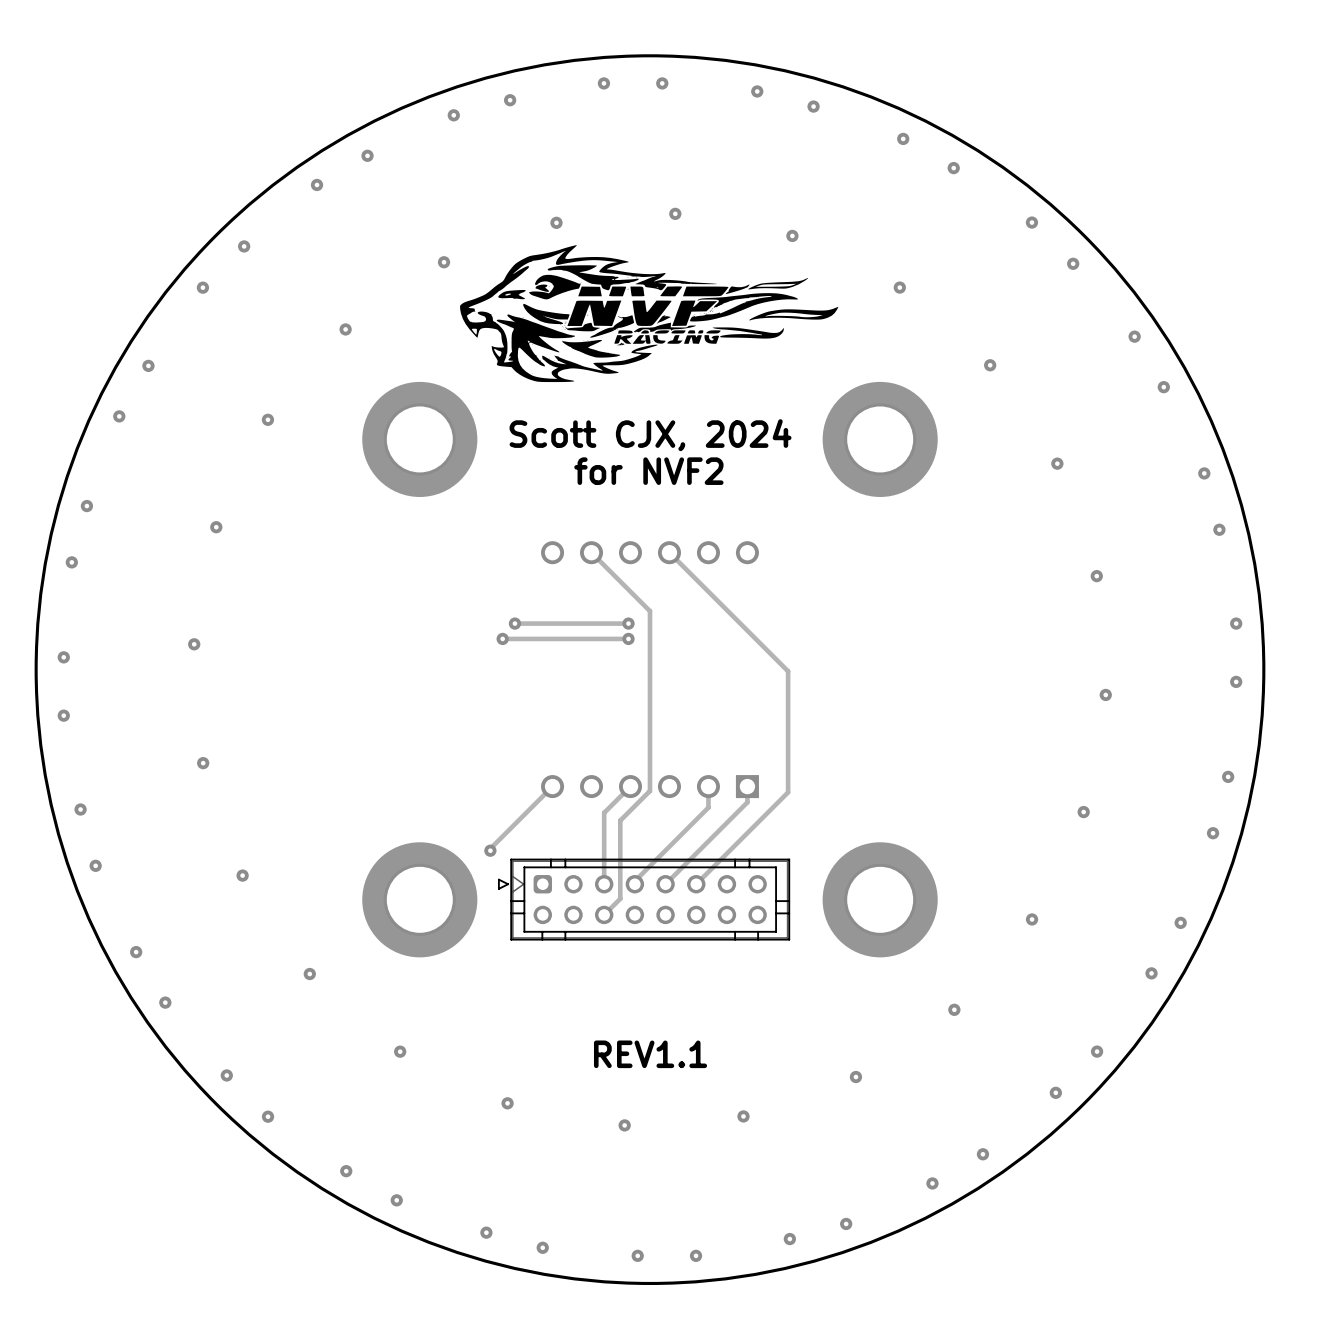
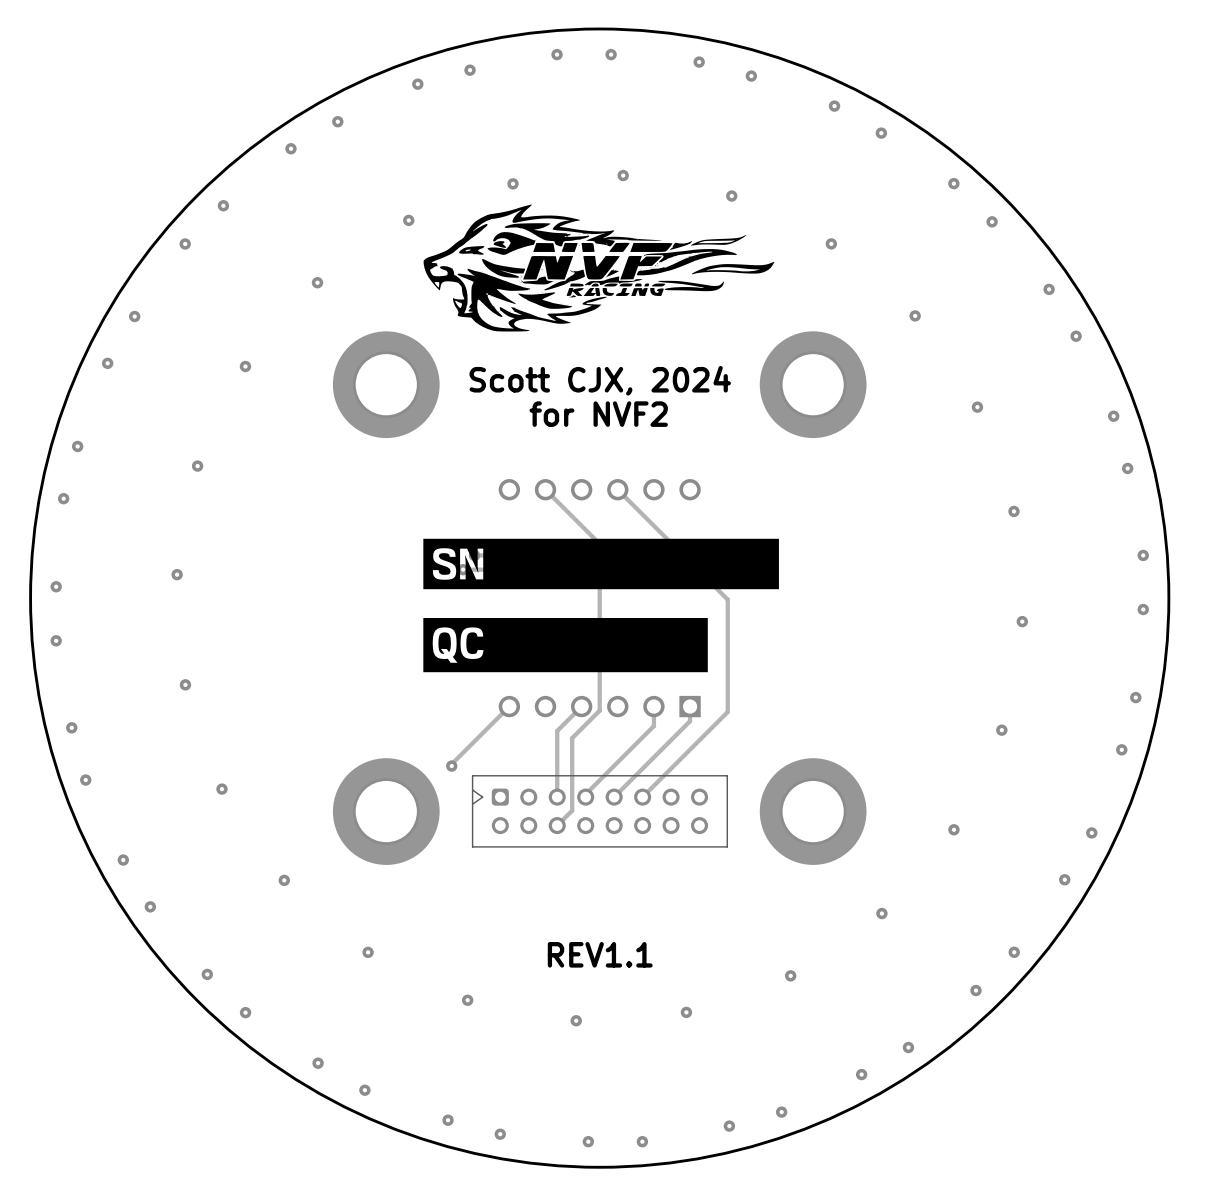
drawing: none -> [423, 538, 779, 590]
drawing: none -> [423, 617, 708, 673]
part footprint: [497, 858, 791, 941] -> [471, 775, 728, 848]

